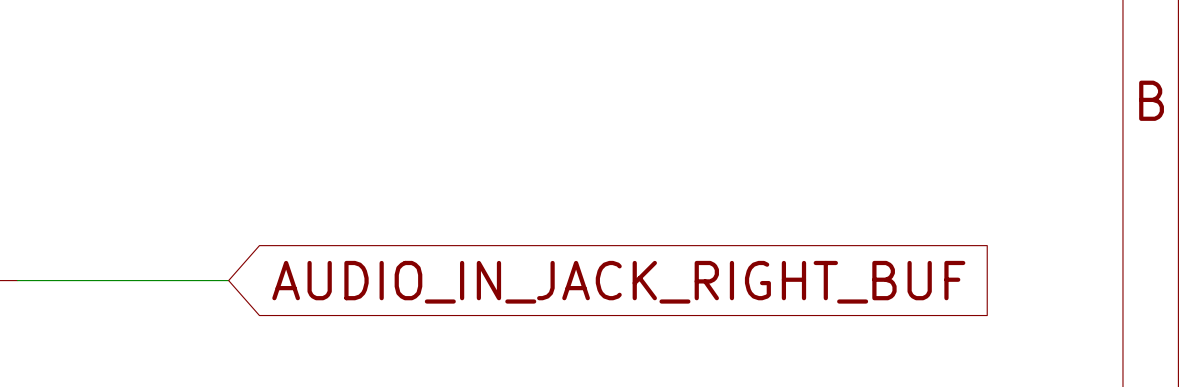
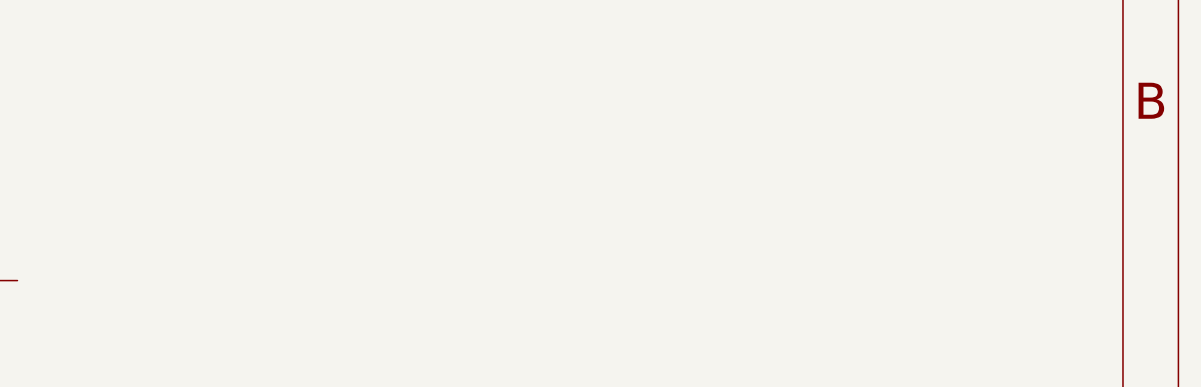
wire: (17, 280) (228, 280) -> none
global label: AUDIO_IN_JACK_RIGHT_BUF (618, 282) -> none

